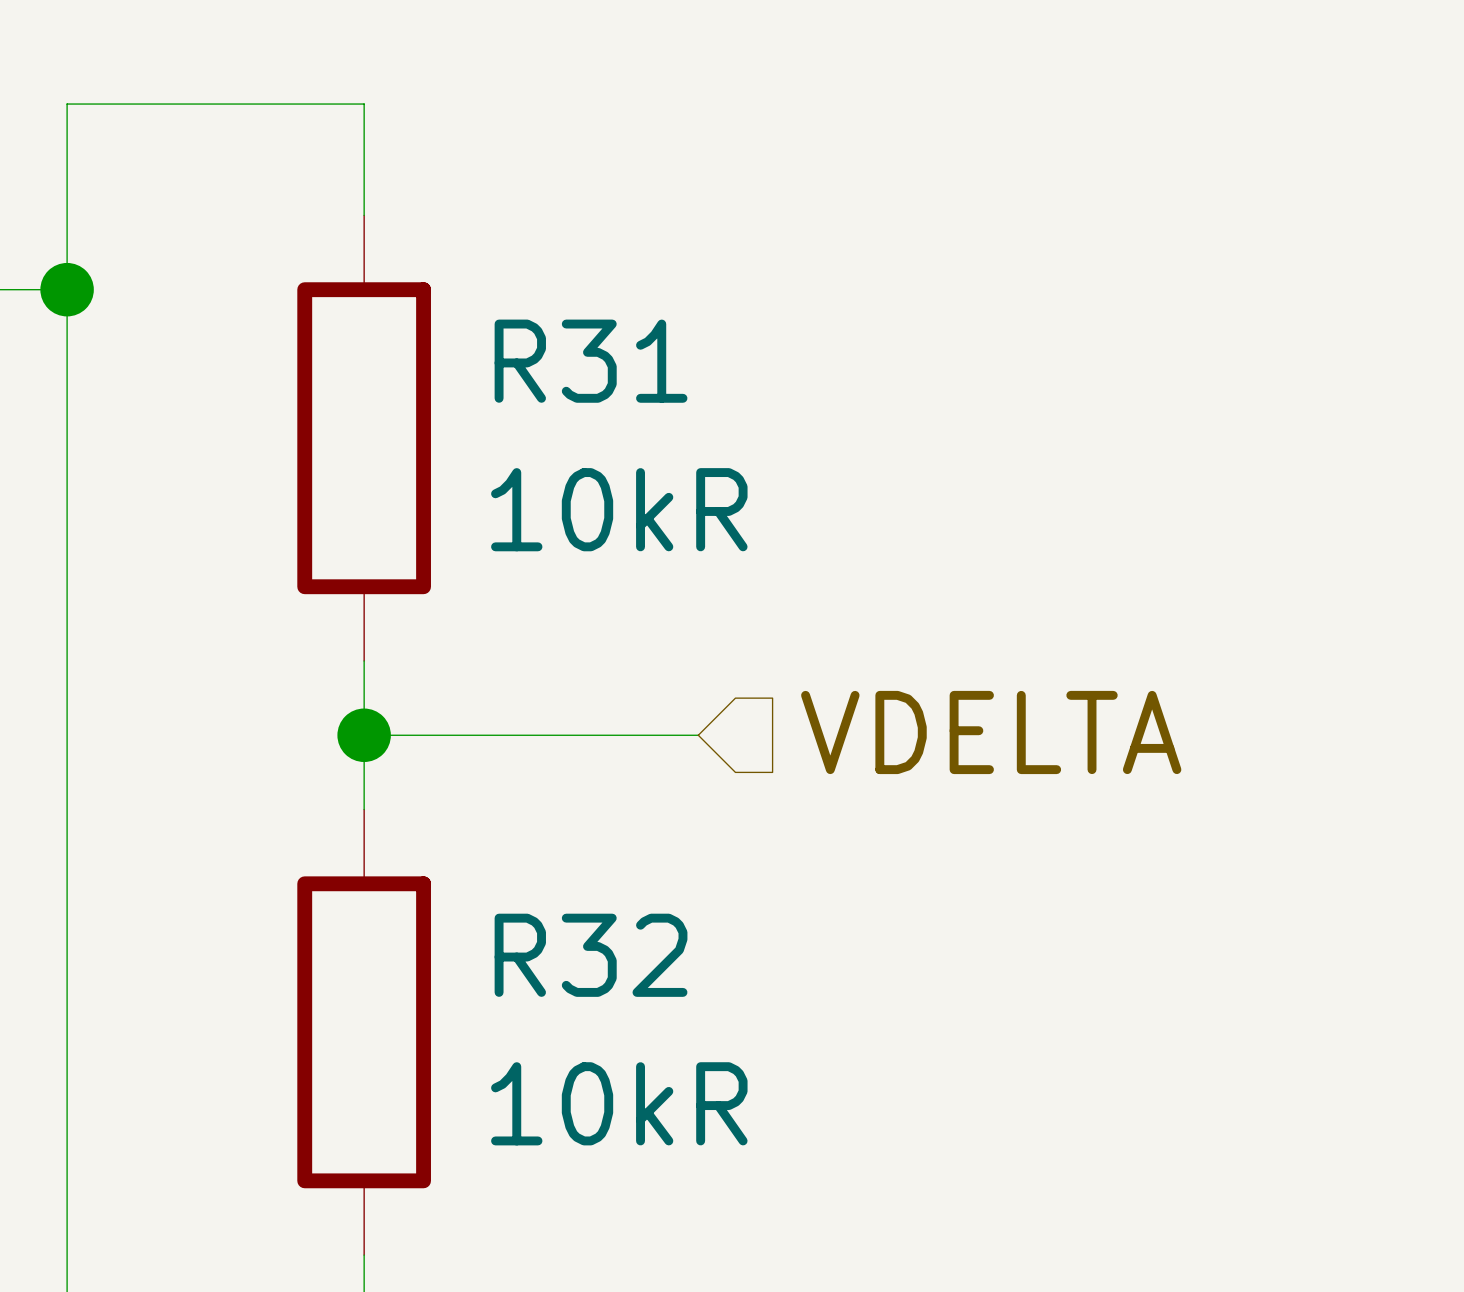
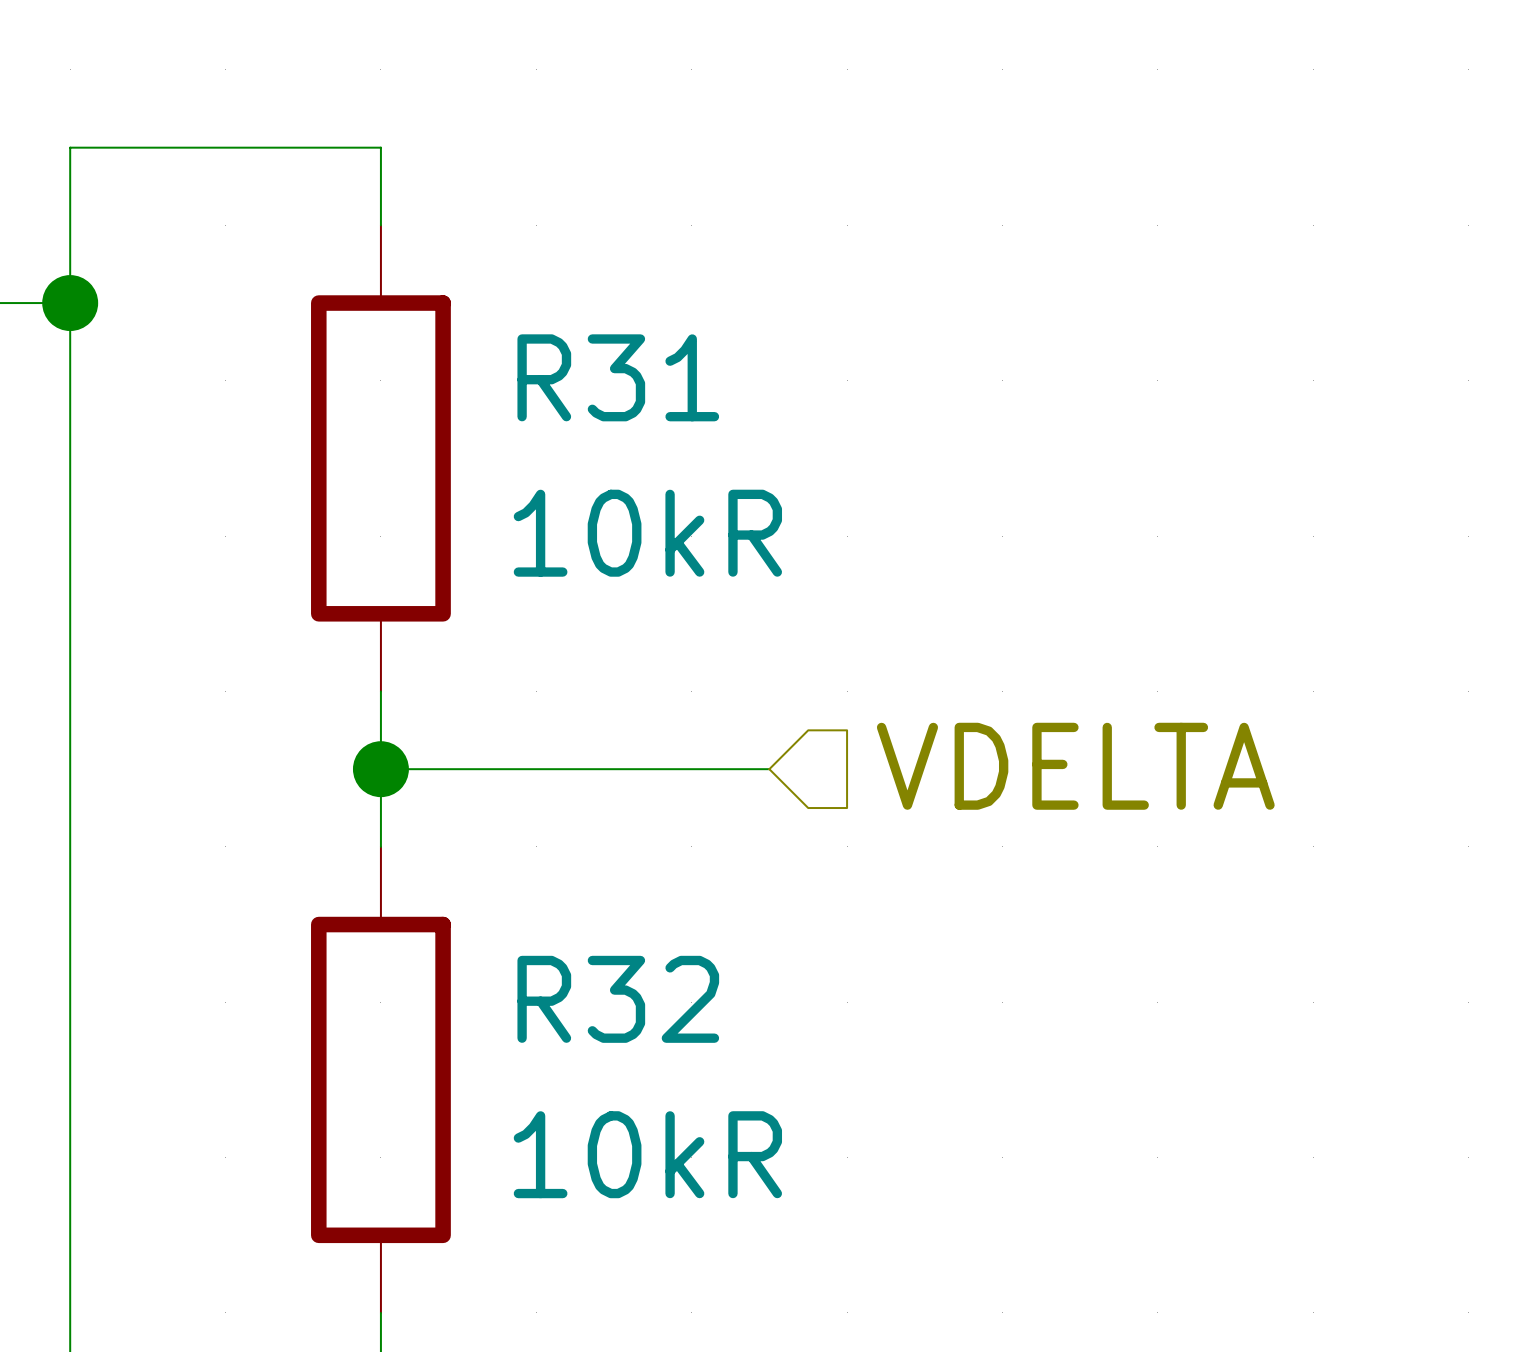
wire: (67, 141) (67, 104) (364, 104) (364, 141) -> (70, 147) (380, 147)
hierarchical label position: VDELTA (991, 732) -> VDELTA (1075, 766)
wire: none -> (730, 769) (769, 769)

